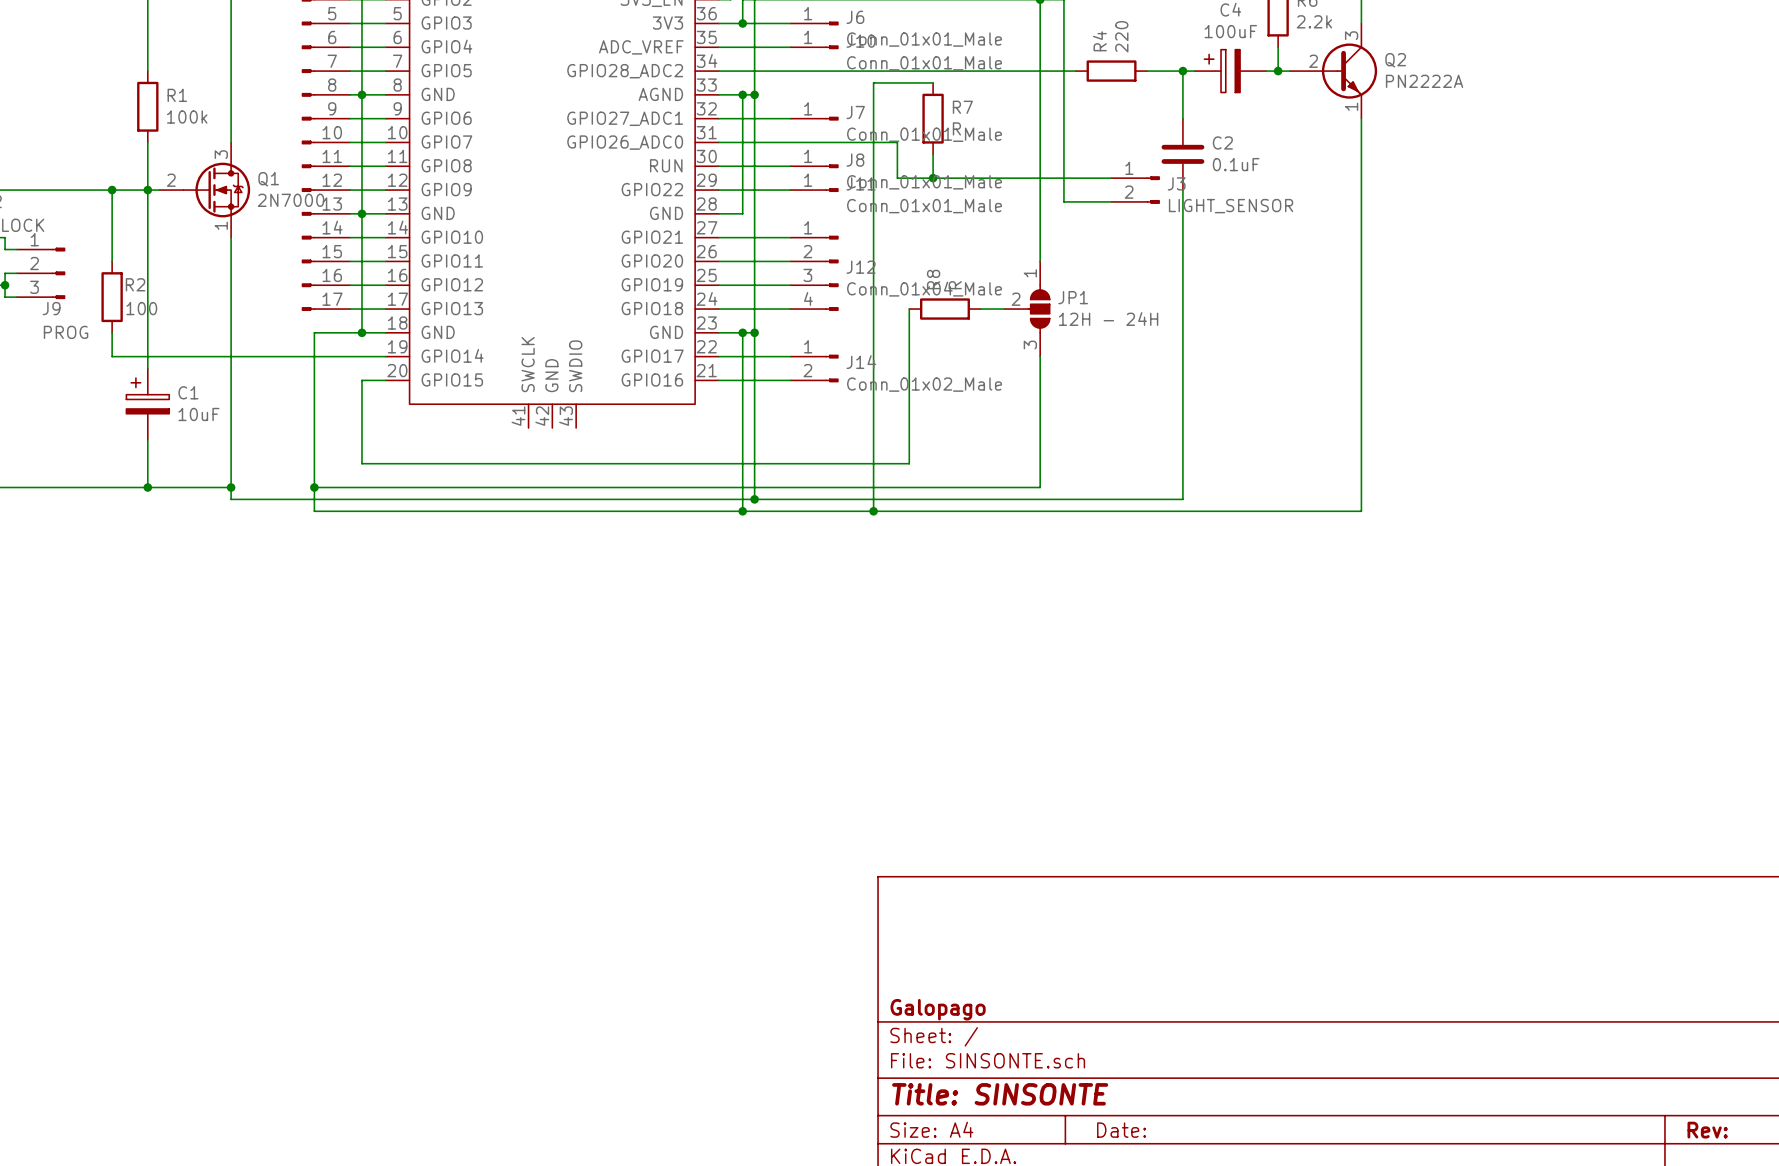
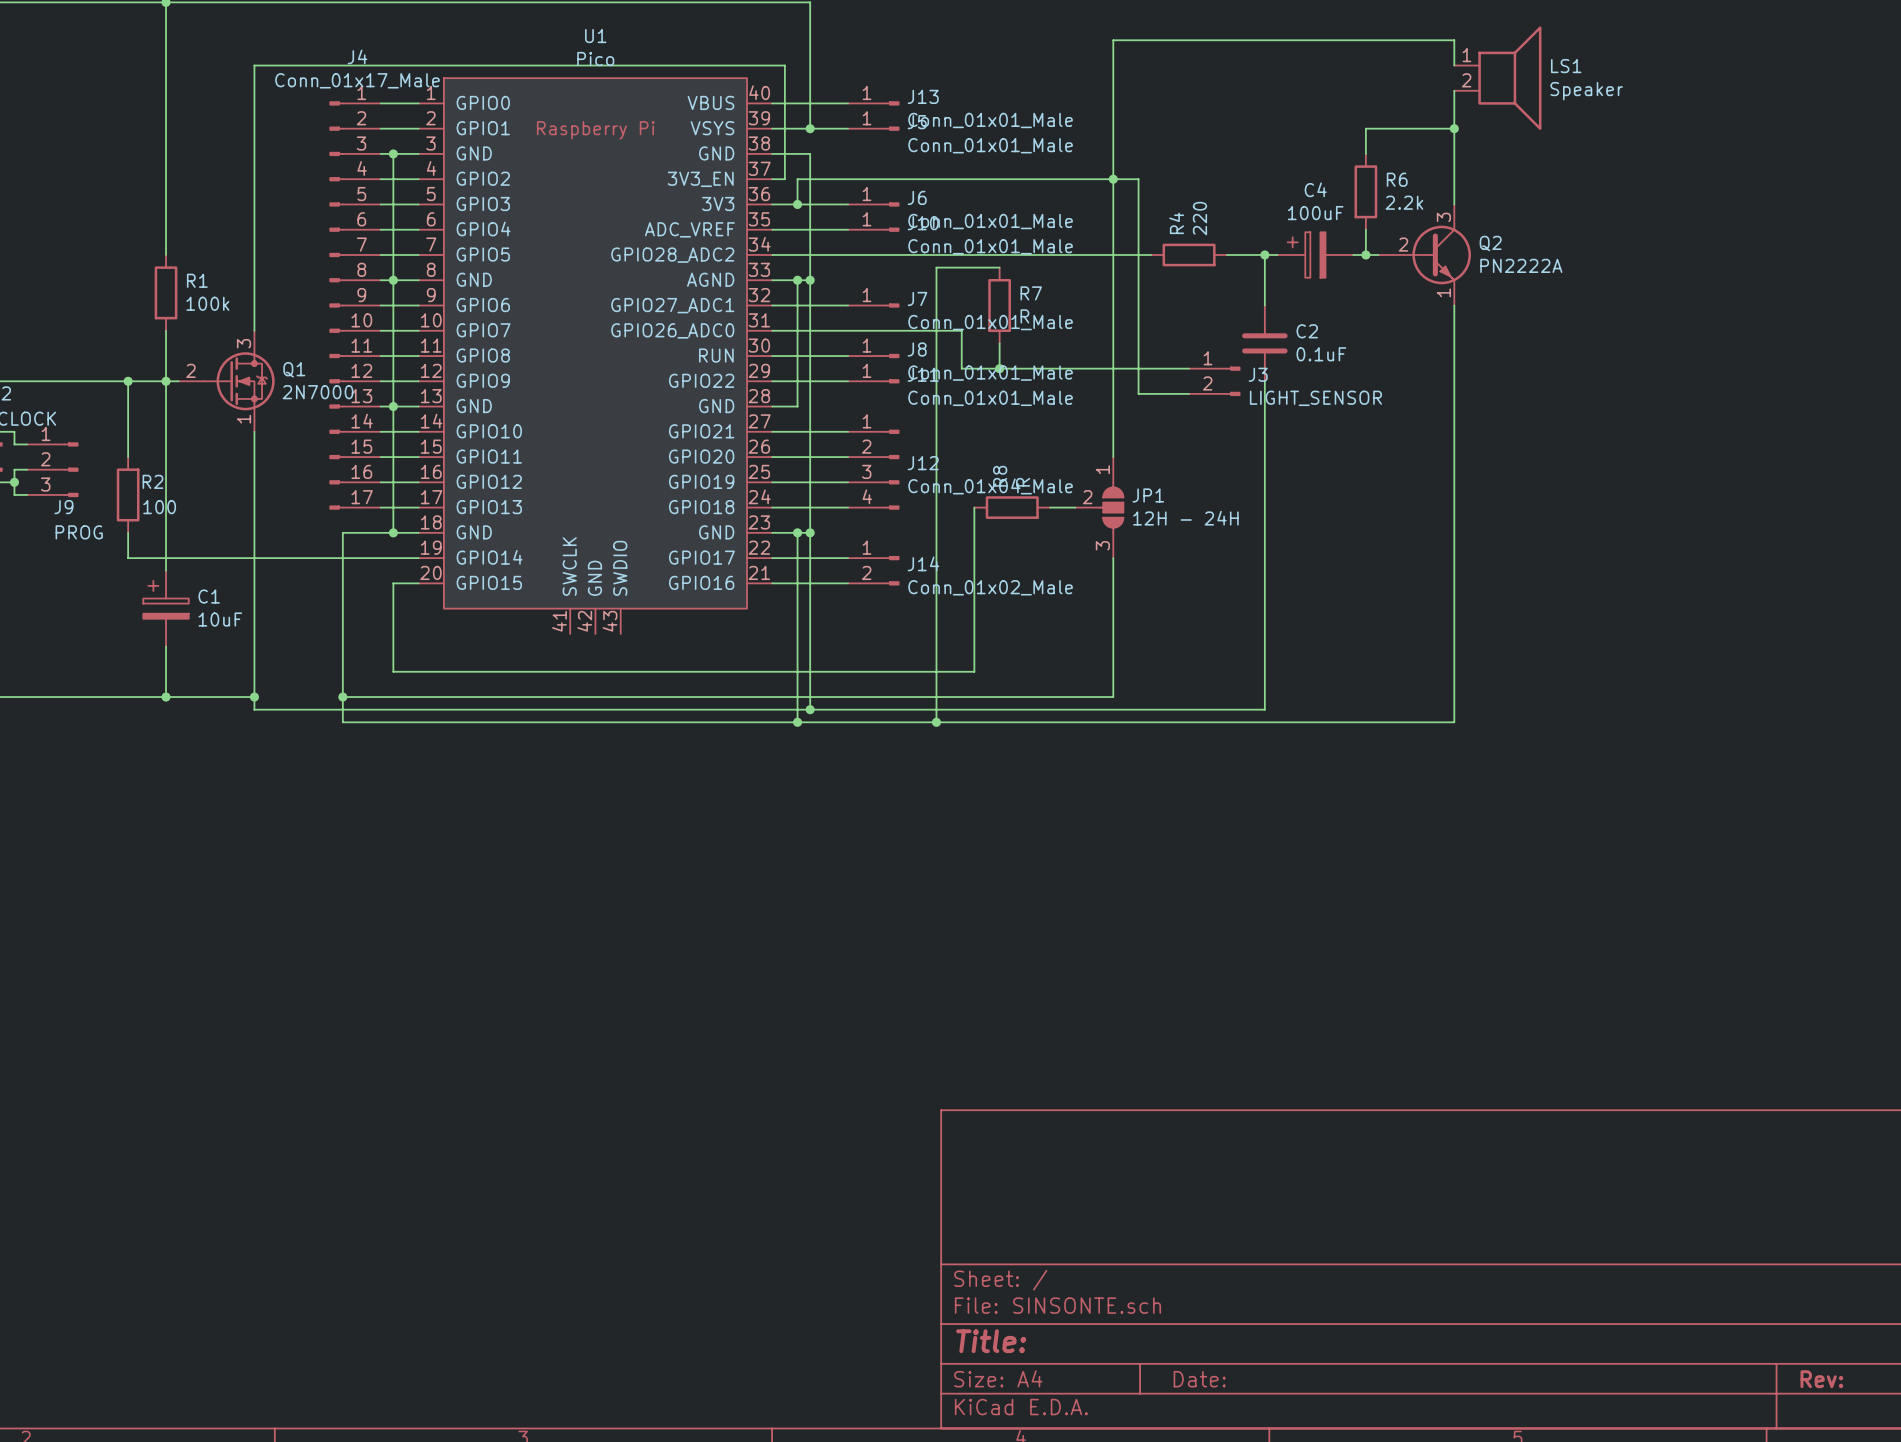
title block: Galopago (938, 1009) -> none
title block: Title: SINSONTE (1000, 1094) -> Title: (991, 1341)

